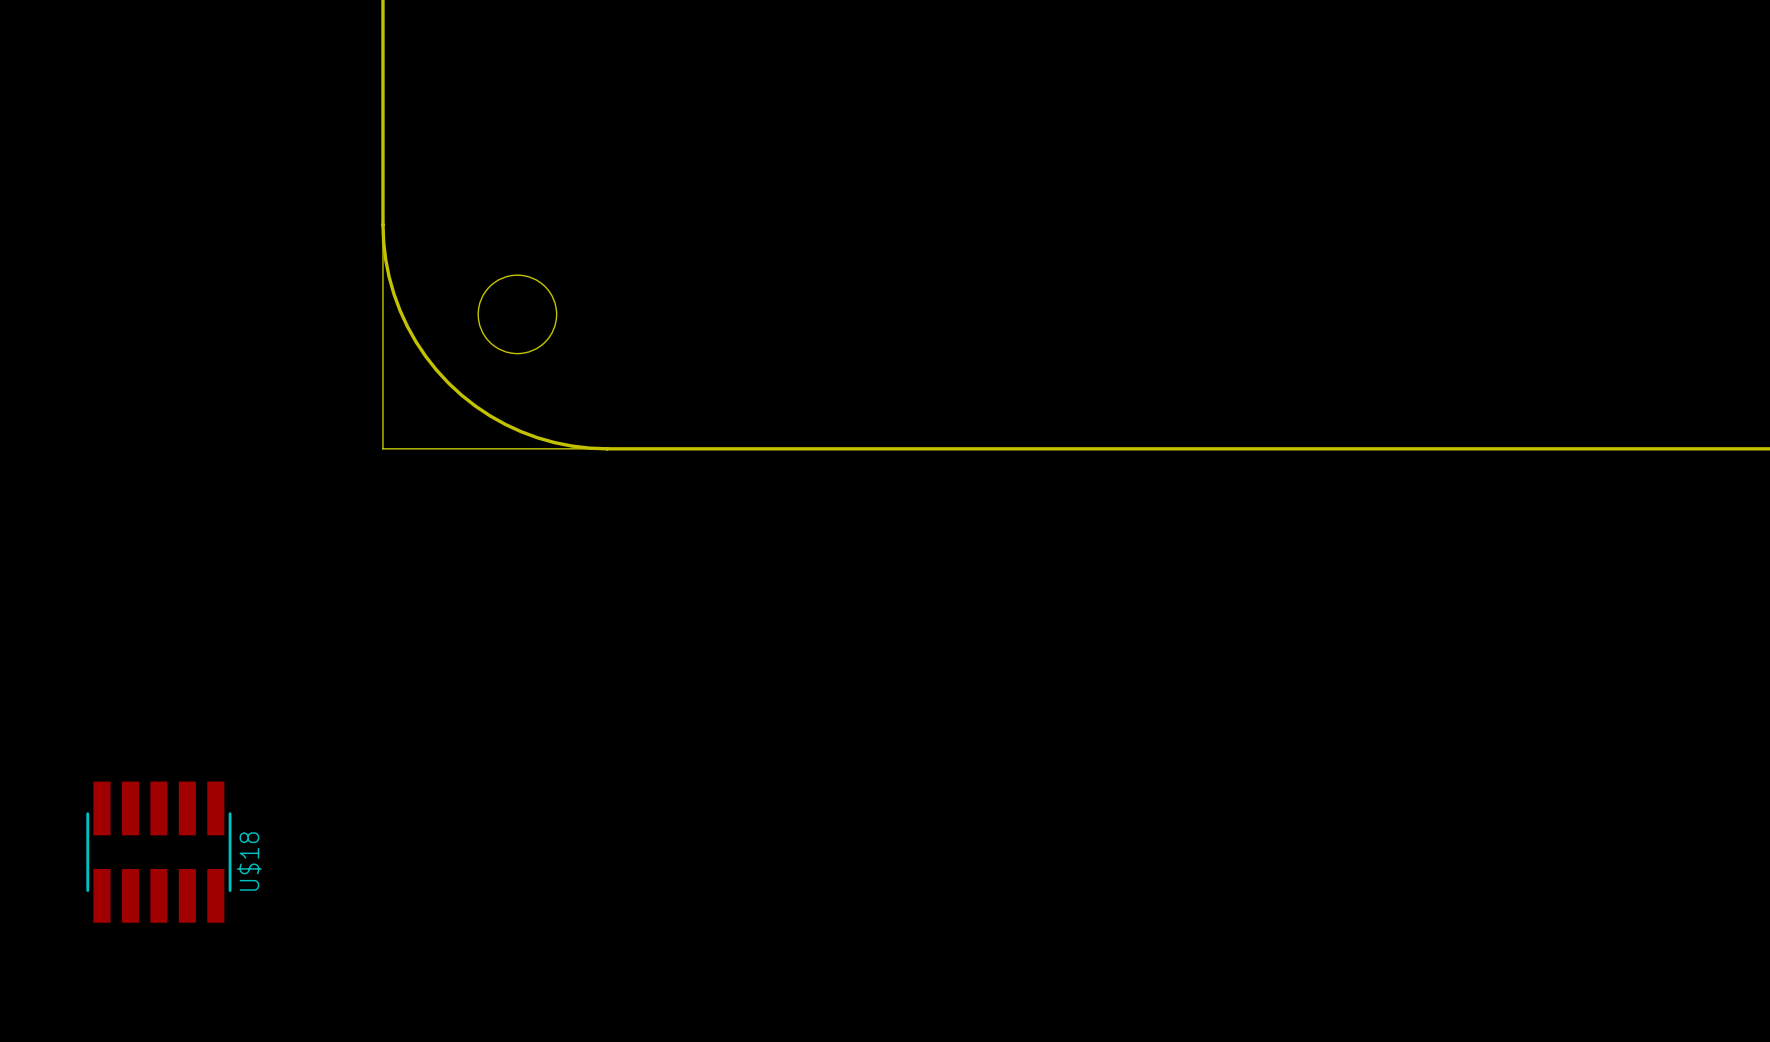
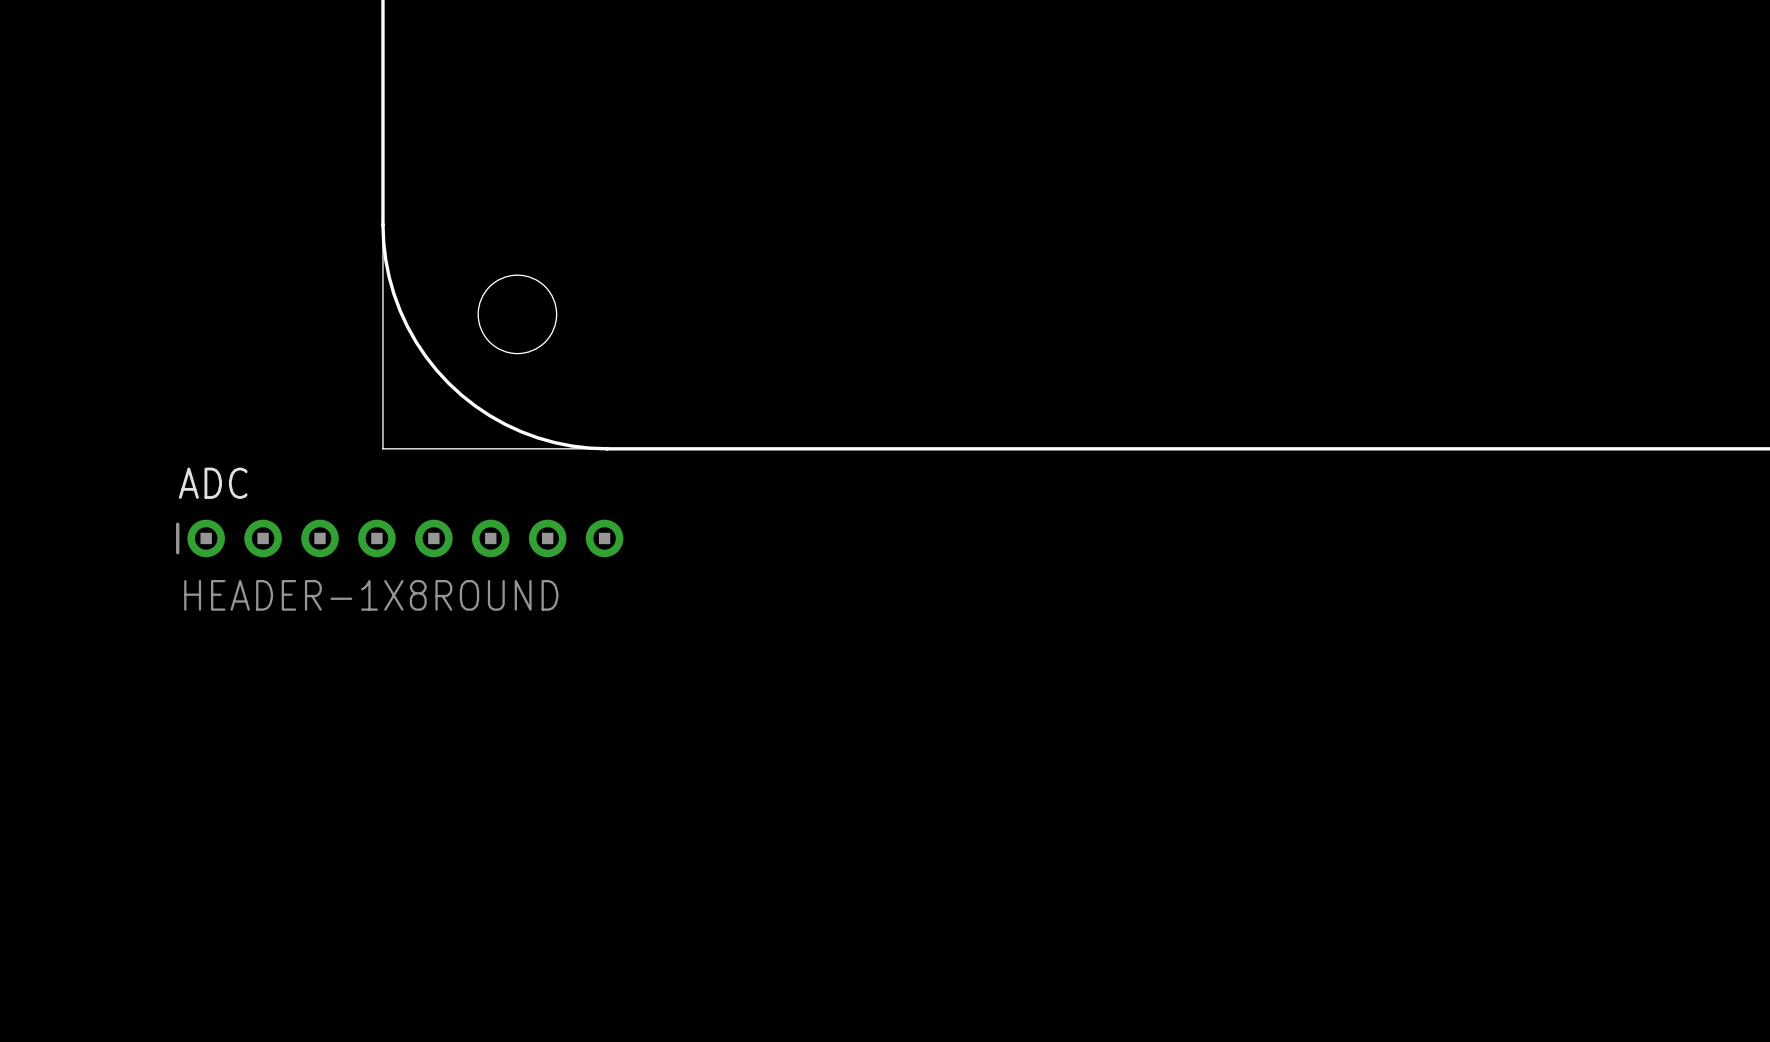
ADC: none -> HEADER-1X8ROUND (399, 538)
U$18: (158, 852) -> none

